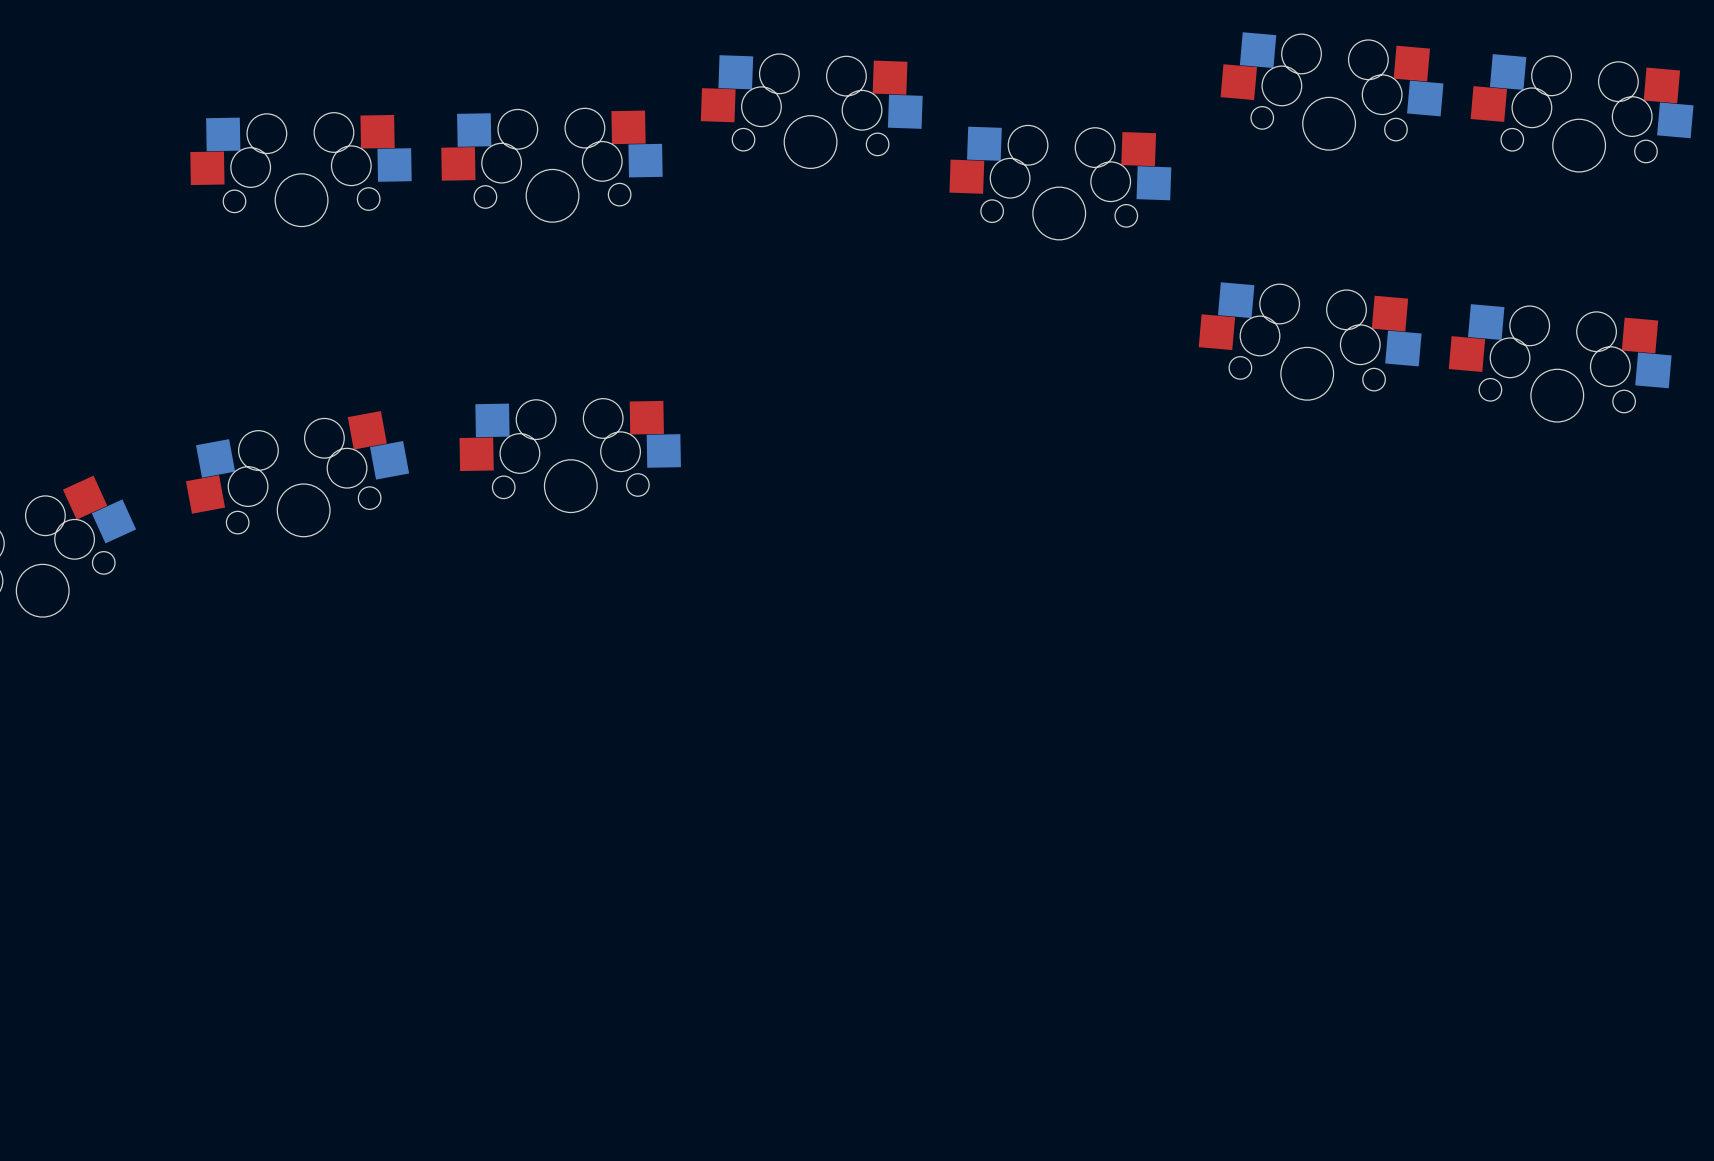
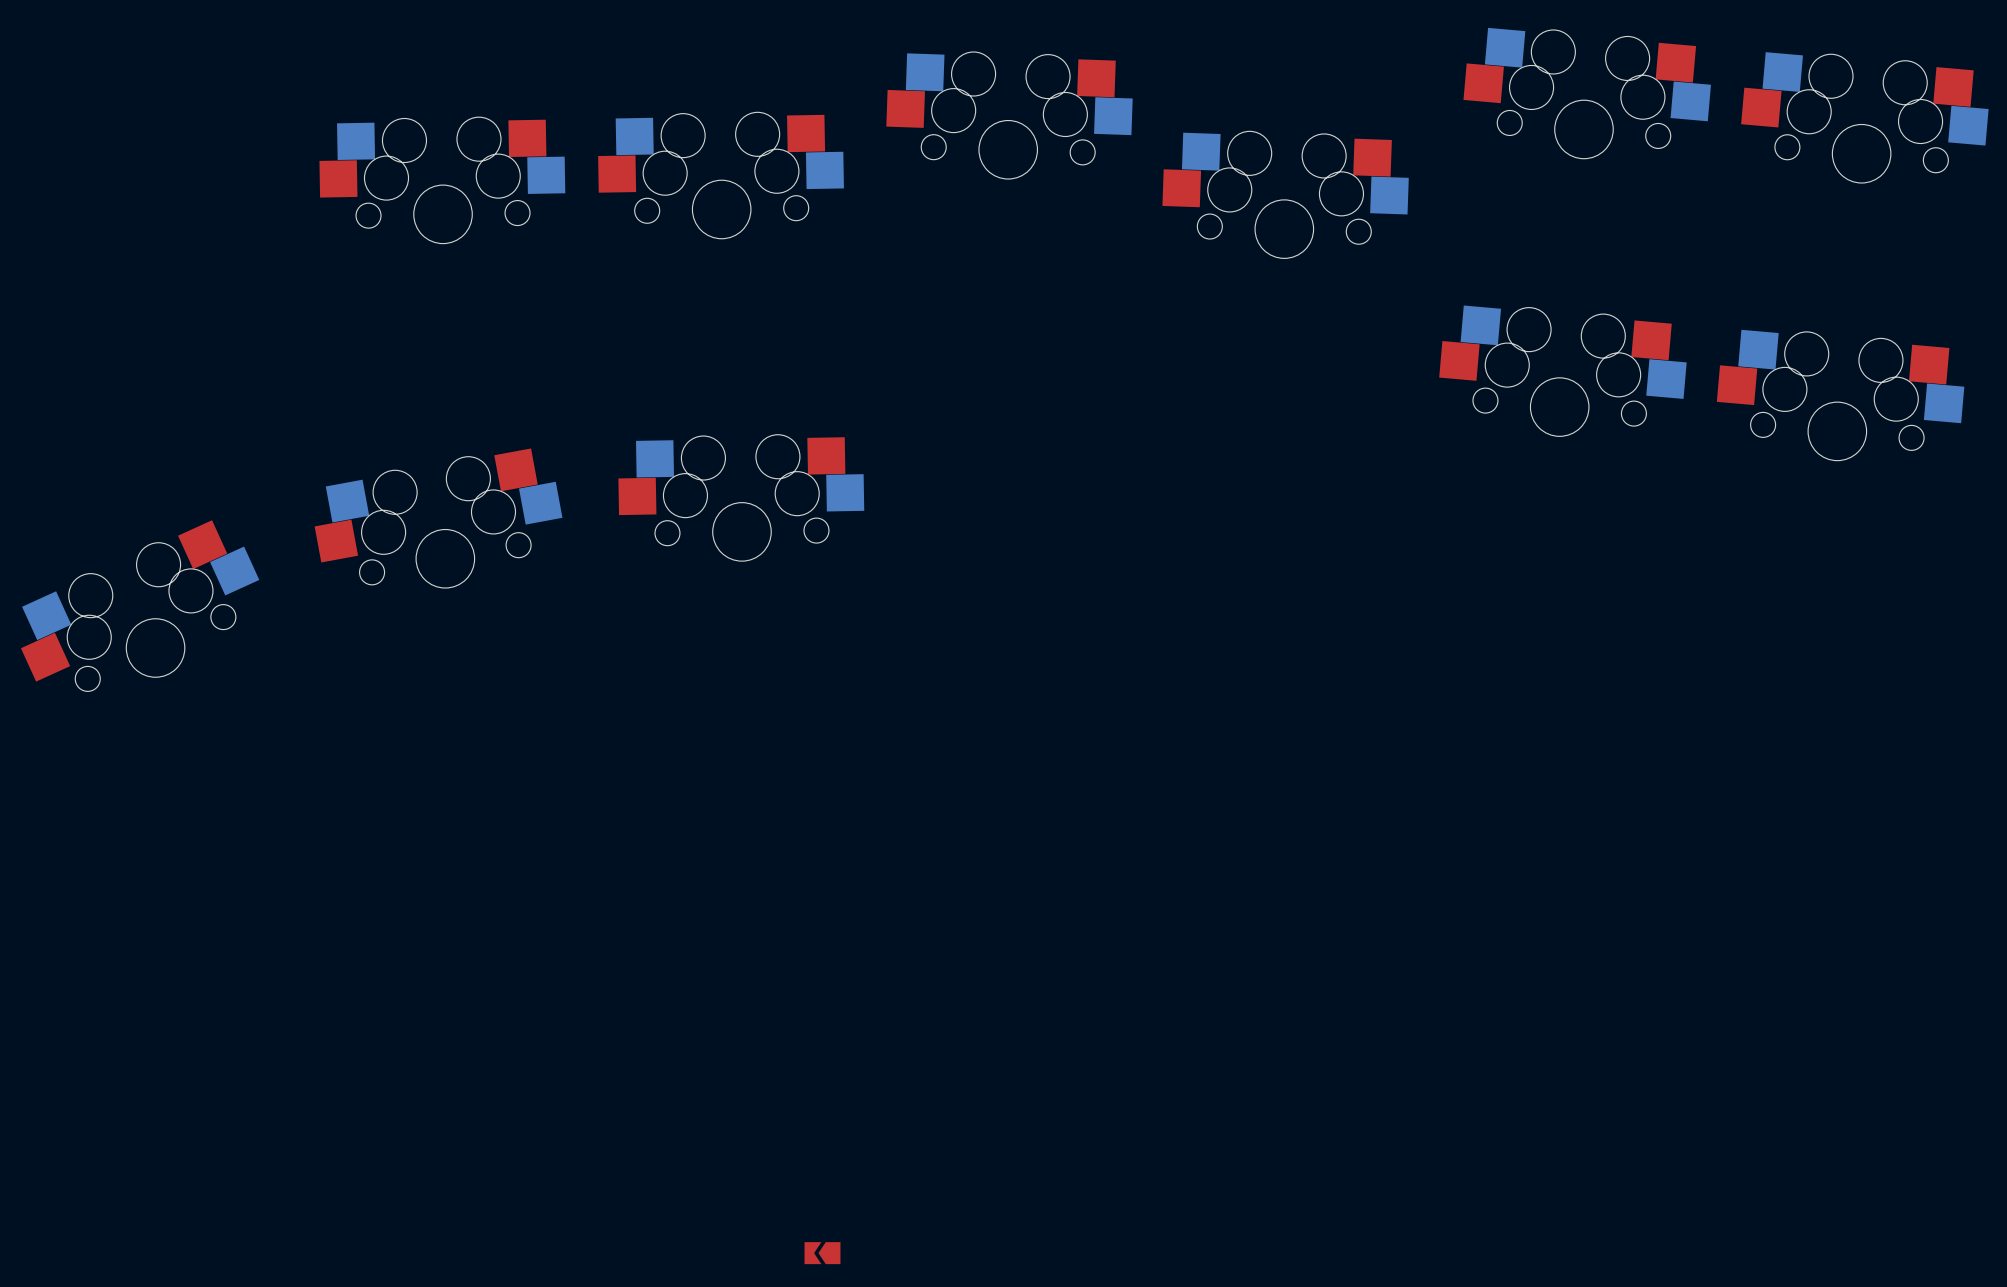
part: none -> (822, 1253)

